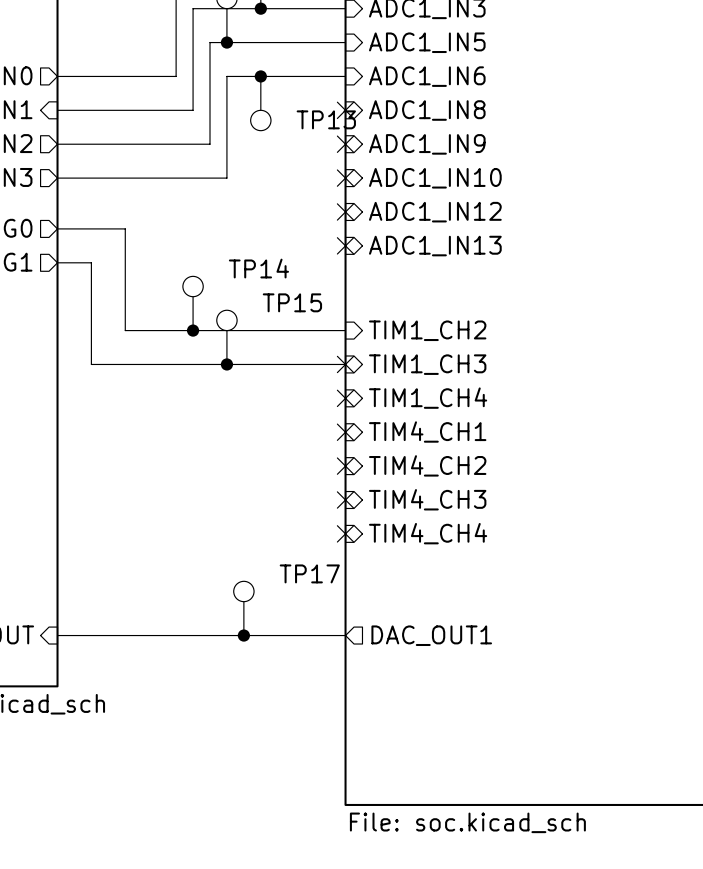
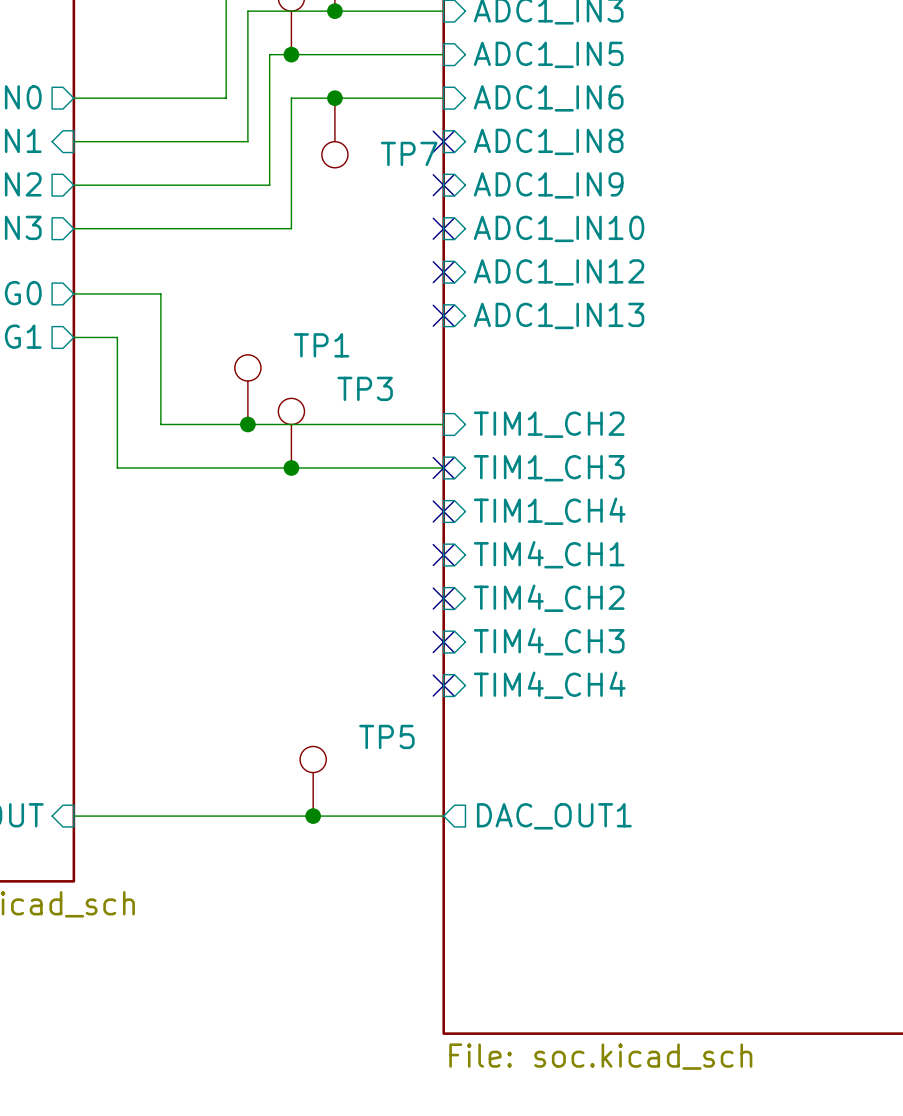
TP13 name: TP13 (326, 119) -> TP7 (409, 153)
TP14 name: TP14 (258, 268) -> TP1 (321, 345)
TP15 name: TP15 (292, 302) -> TP3 (365, 388)
TP17 name: TP17 (309, 573) -> TP5 (386, 736)

